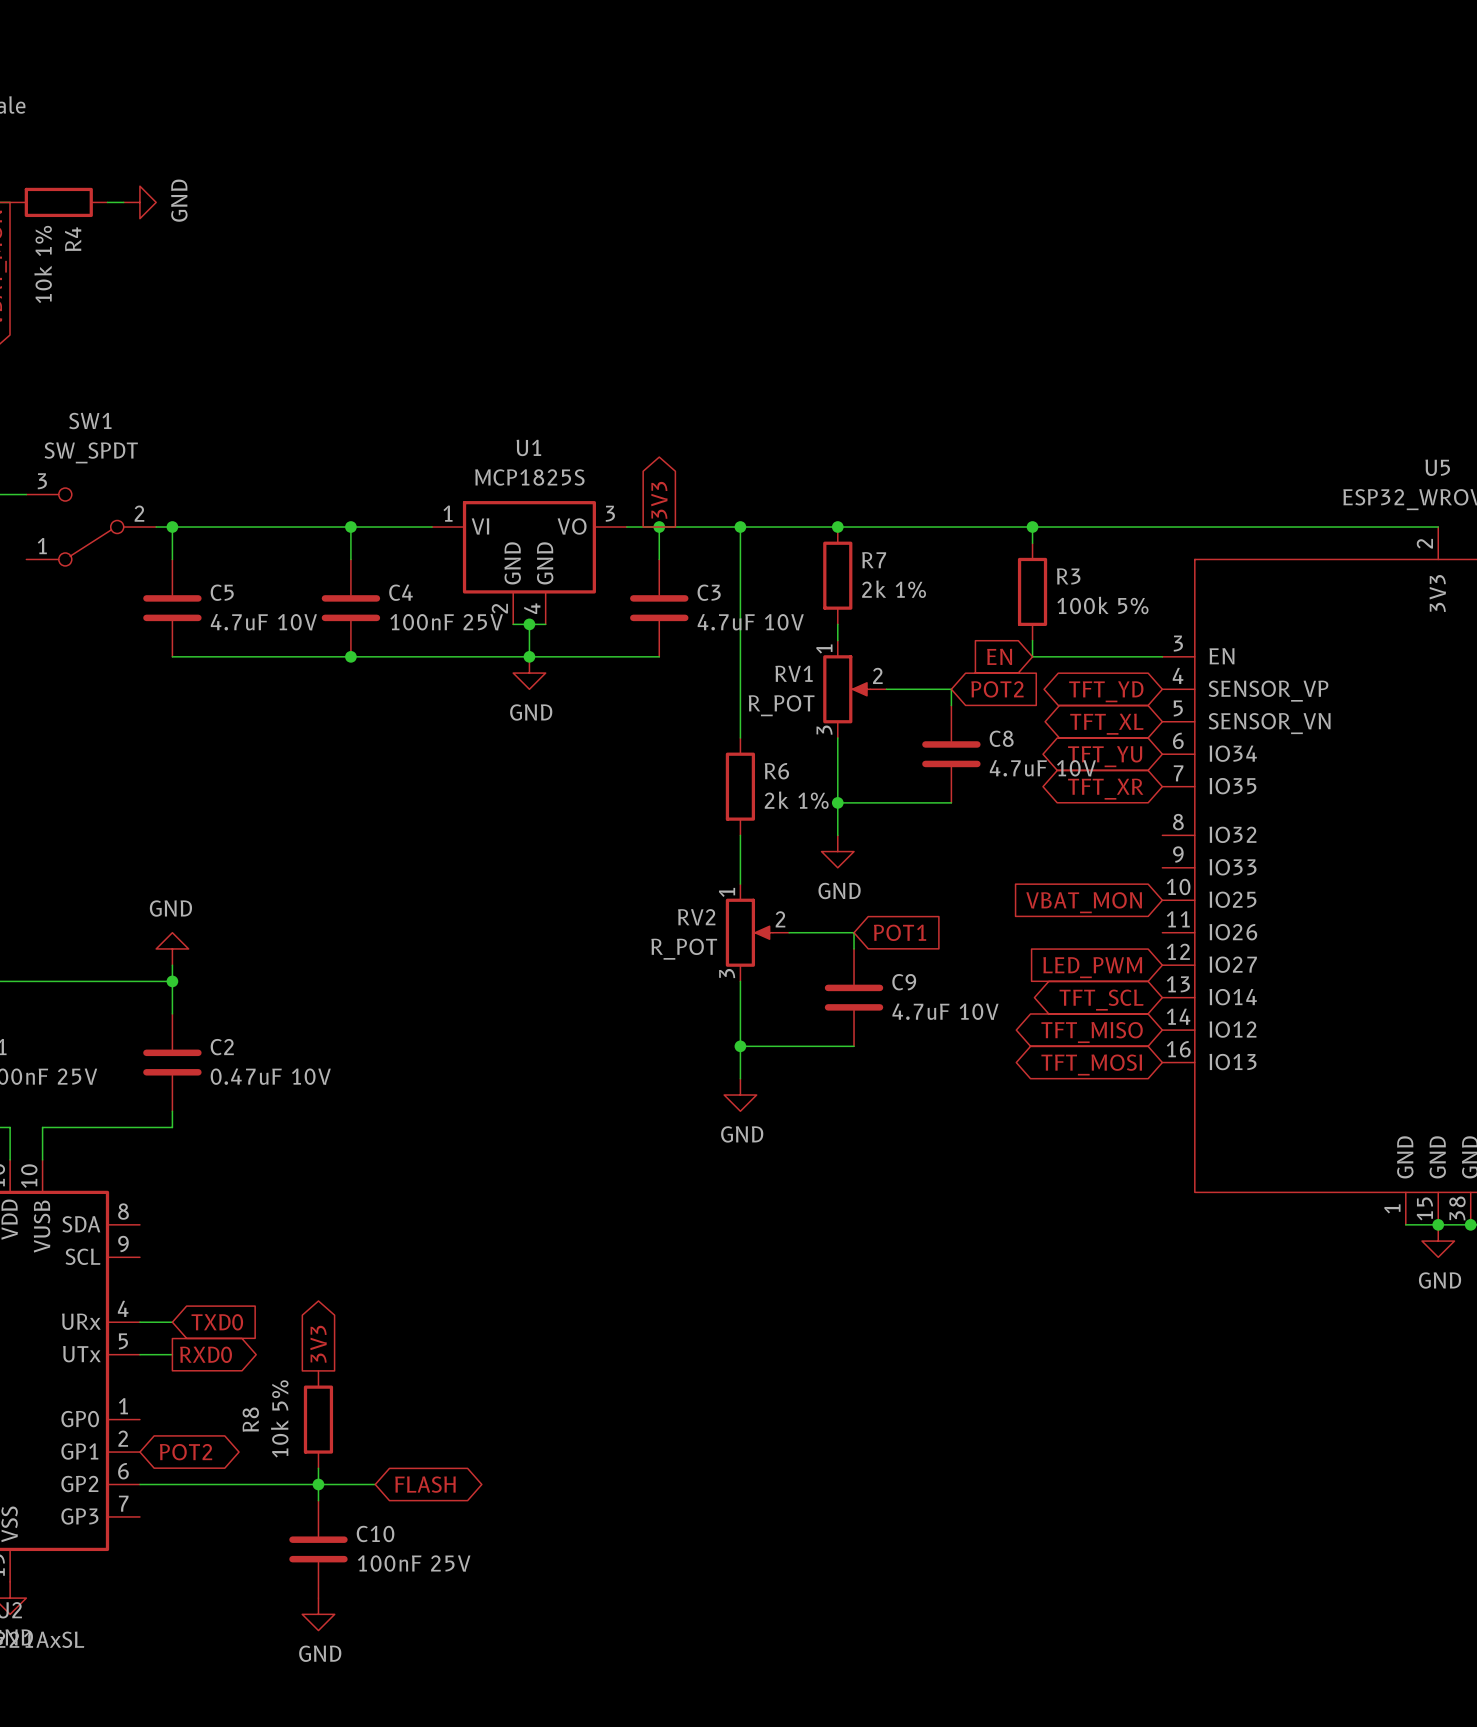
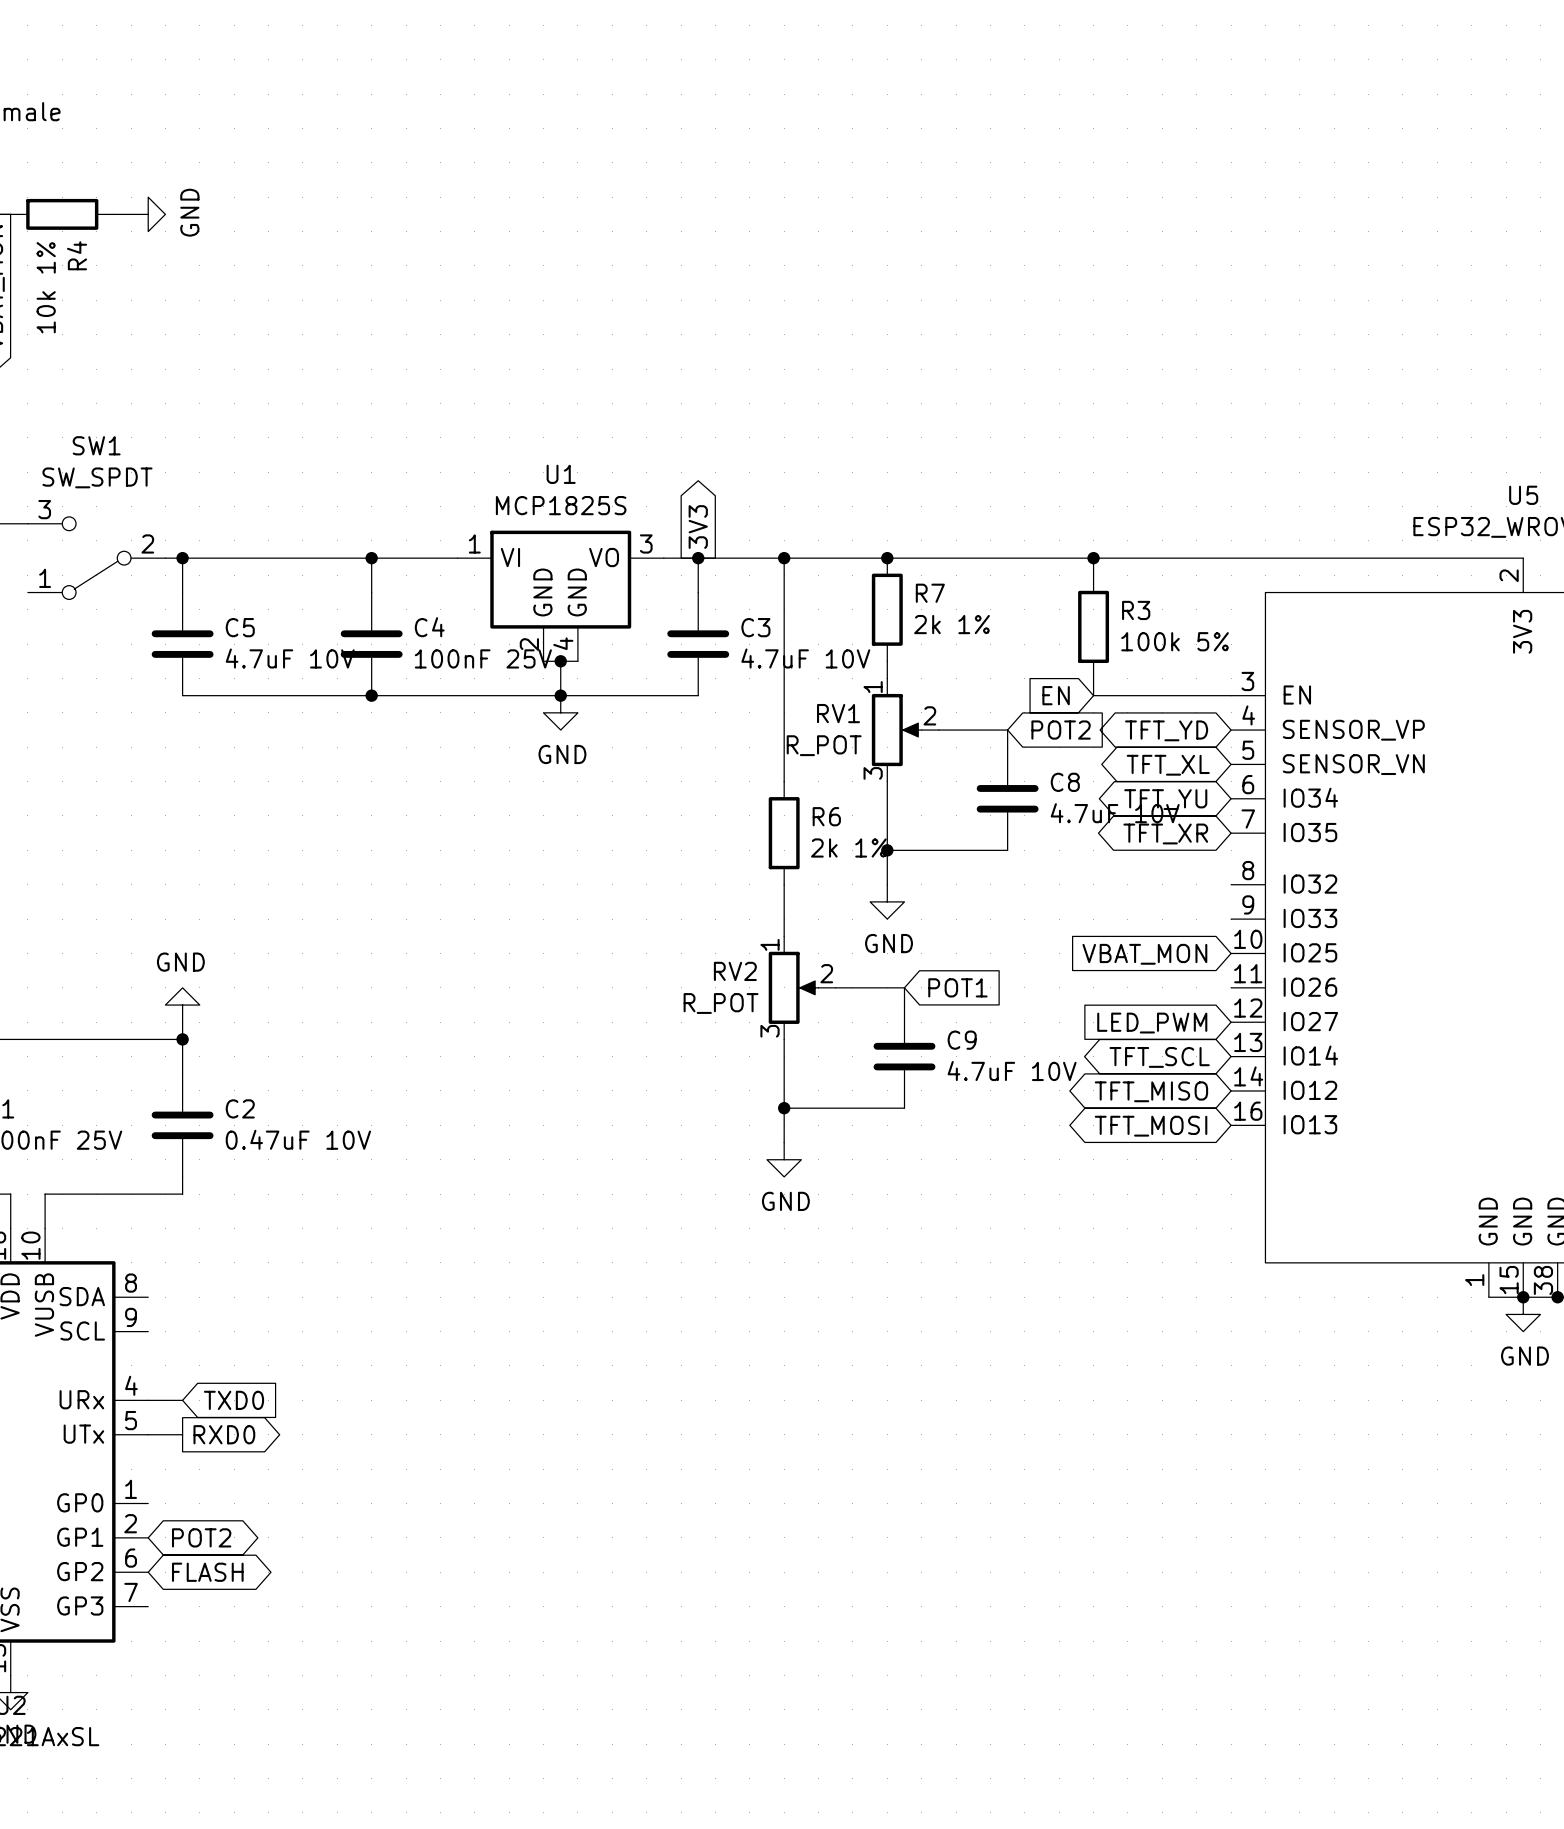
global label: 3V3 (318, 1344) -> none
R8: 10k 5% (318, 1419) -> none
wire: (318, 1468) (318, 1500) -> none
wire: (139, 1484) (375, 1484) -> none
junction: (318, 1484) -> none
global label position: FLASH (425, 1484) -> FLASH (207, 1572)
C10: 100nF 25V (318, 1549) -> none
power symbol: GND (318, 1614) -> none

